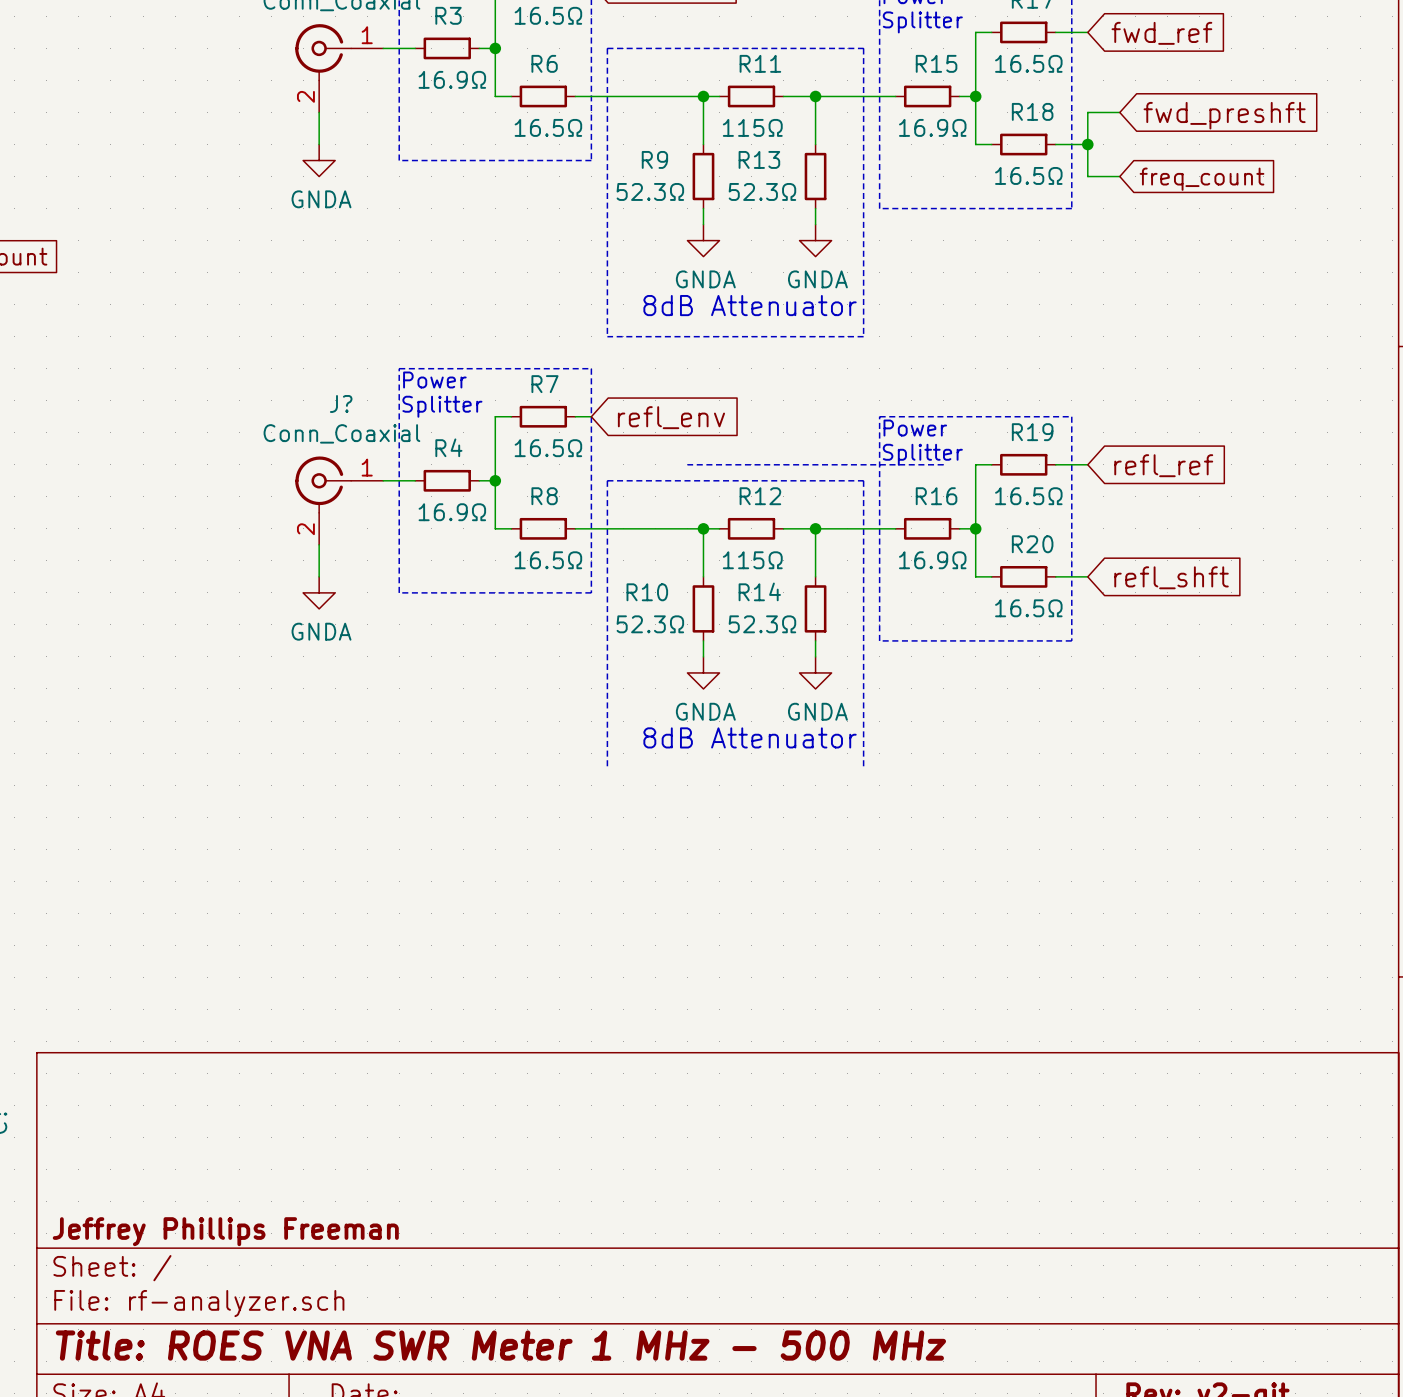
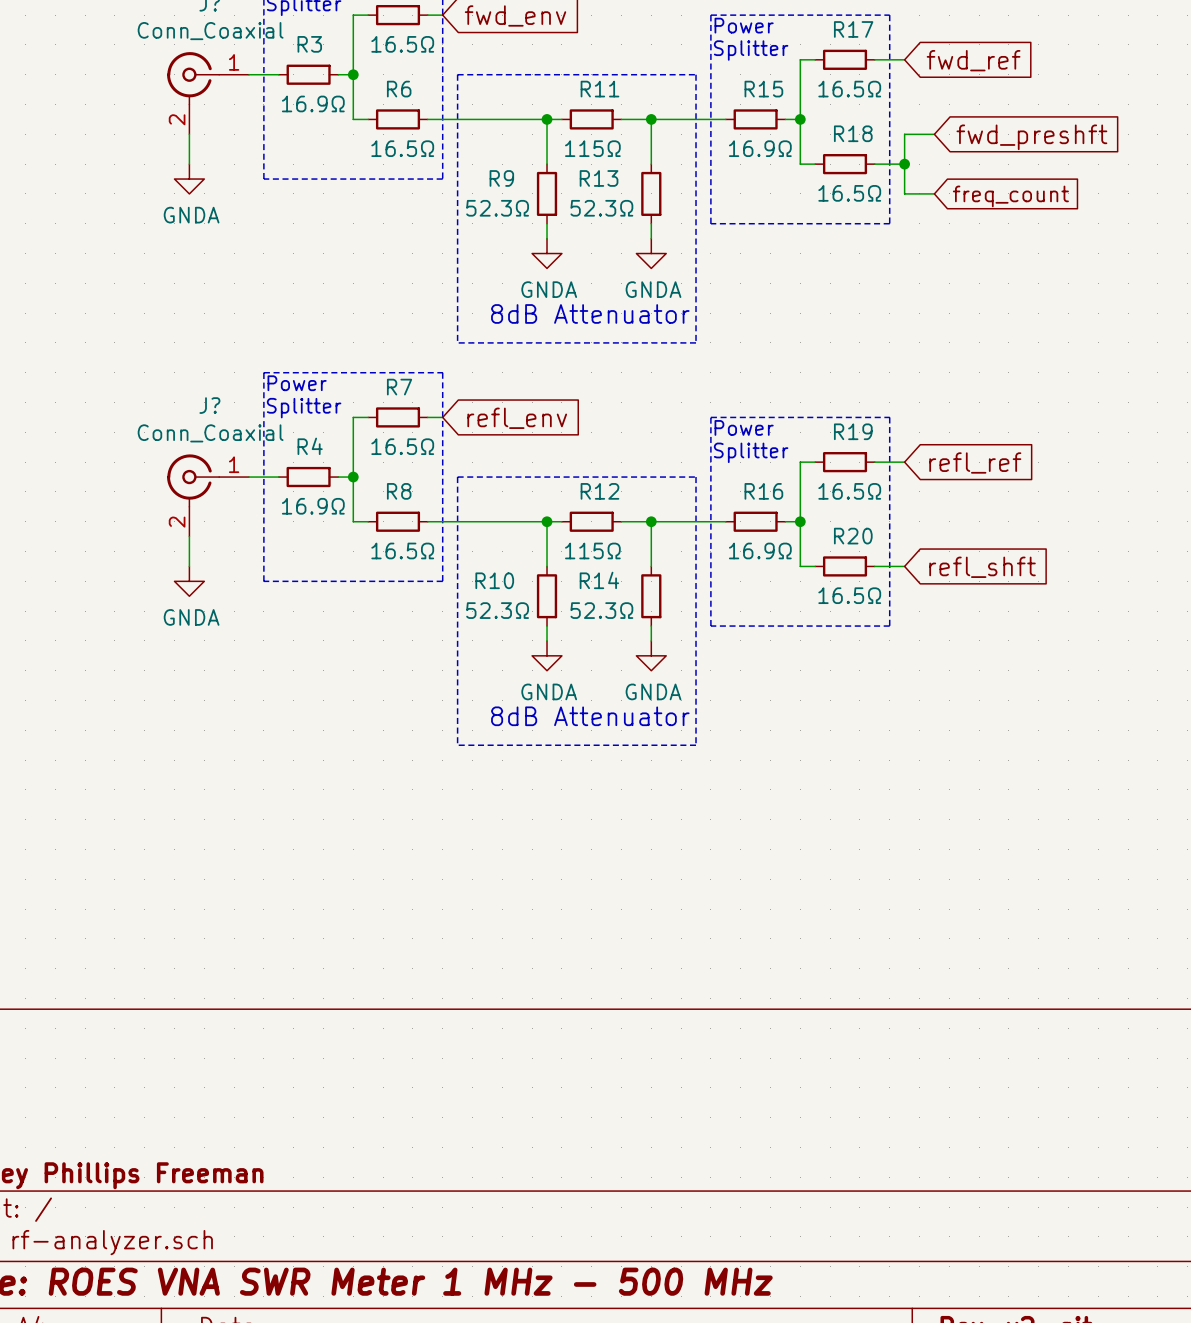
line: (687, 464) (943, 464) -> (457, 745) (696, 745)

